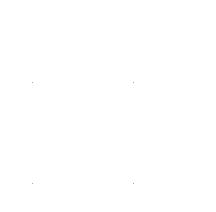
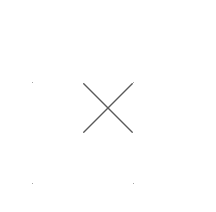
no-connect mark: none -> (107, 107)

